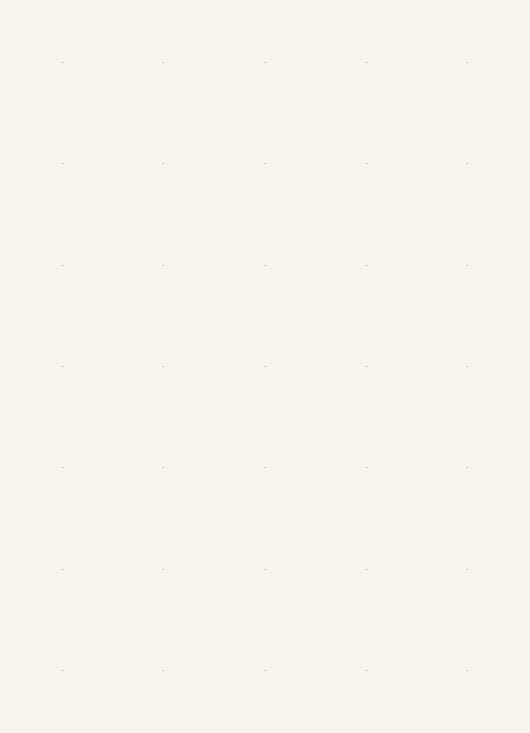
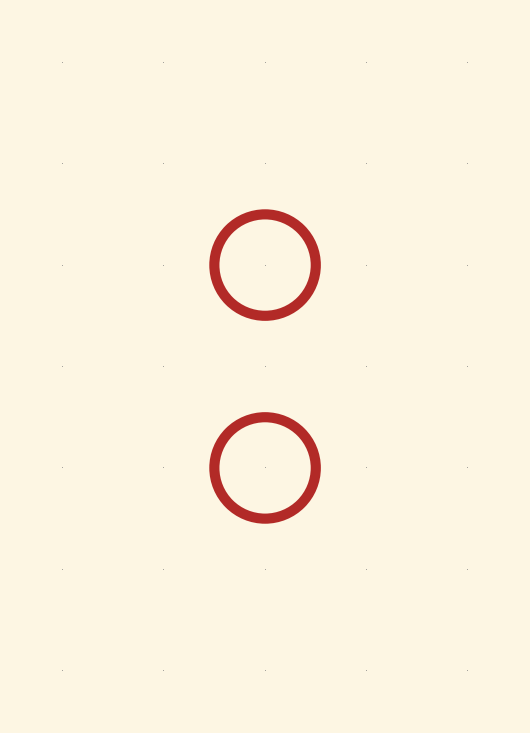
part: none -> (265, 265)
part: none -> (265, 467)

